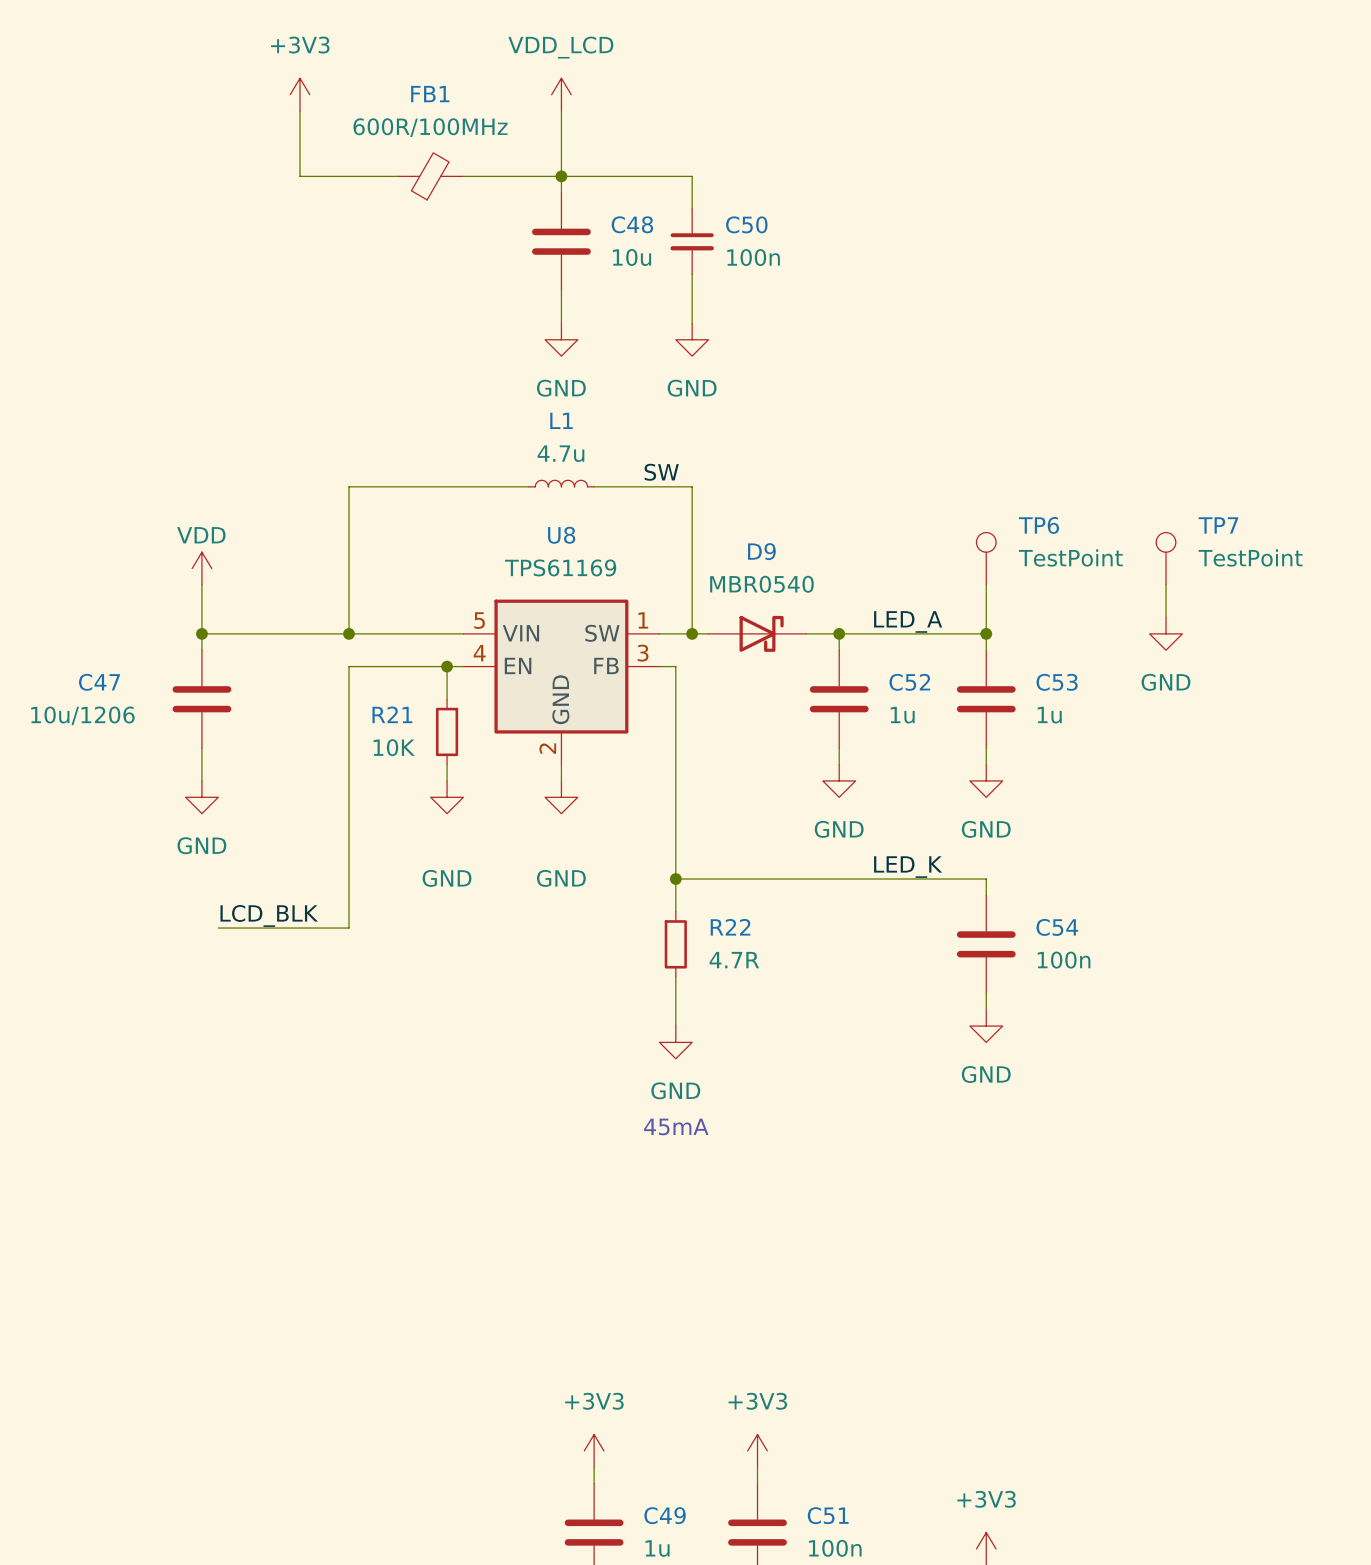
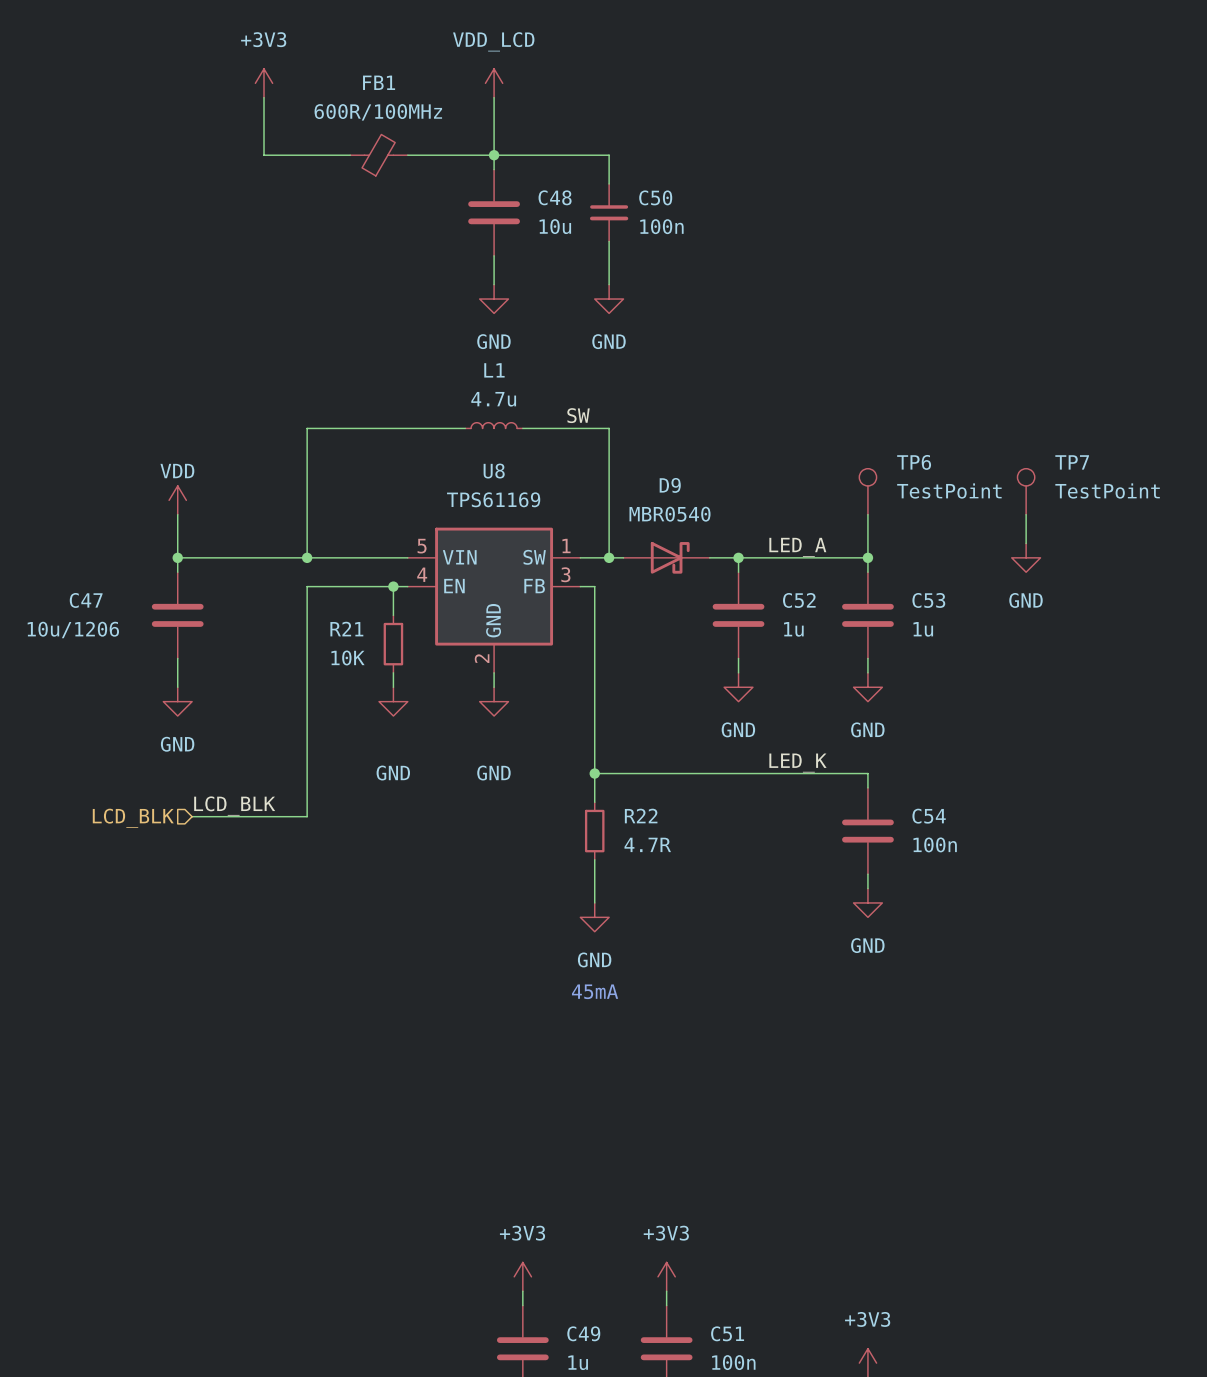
hierarchical label: none -> LCD_BLK (133, 818)

